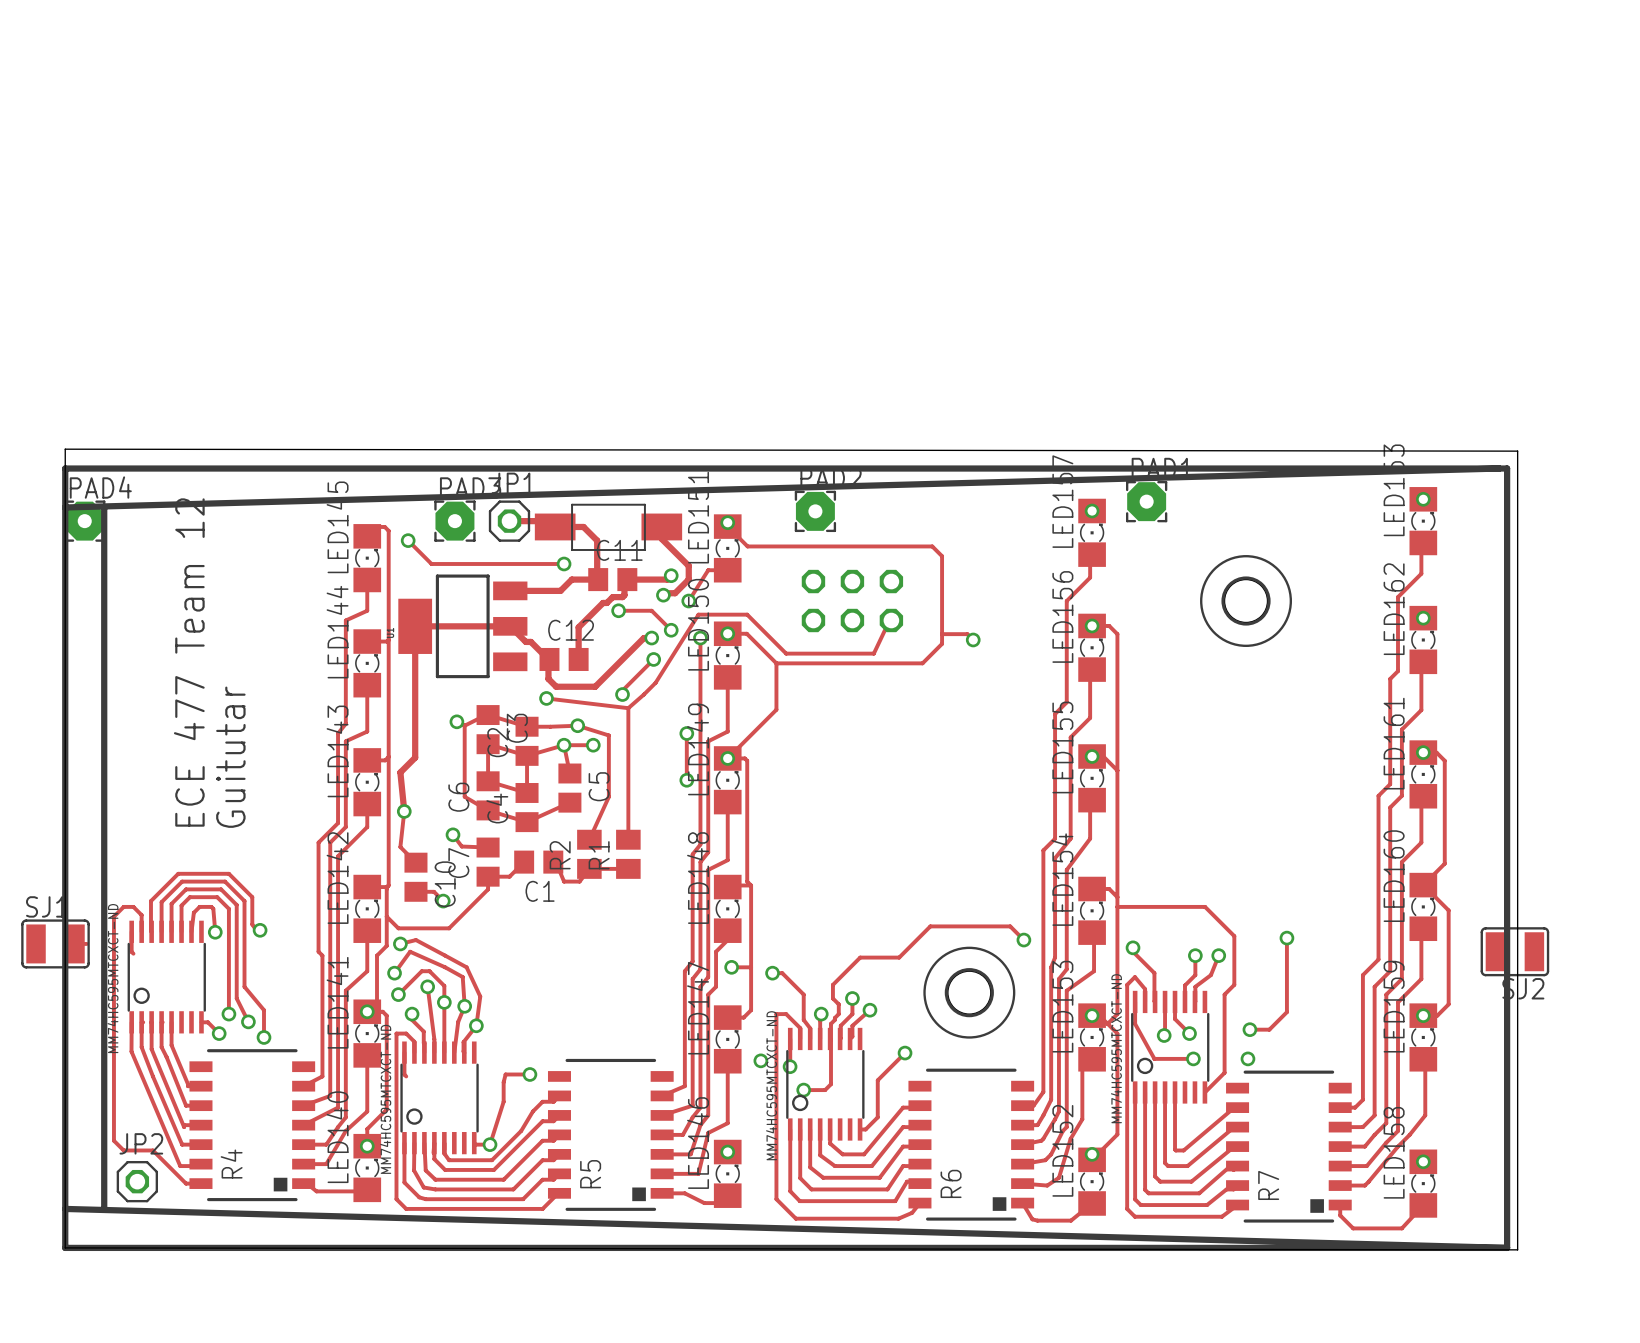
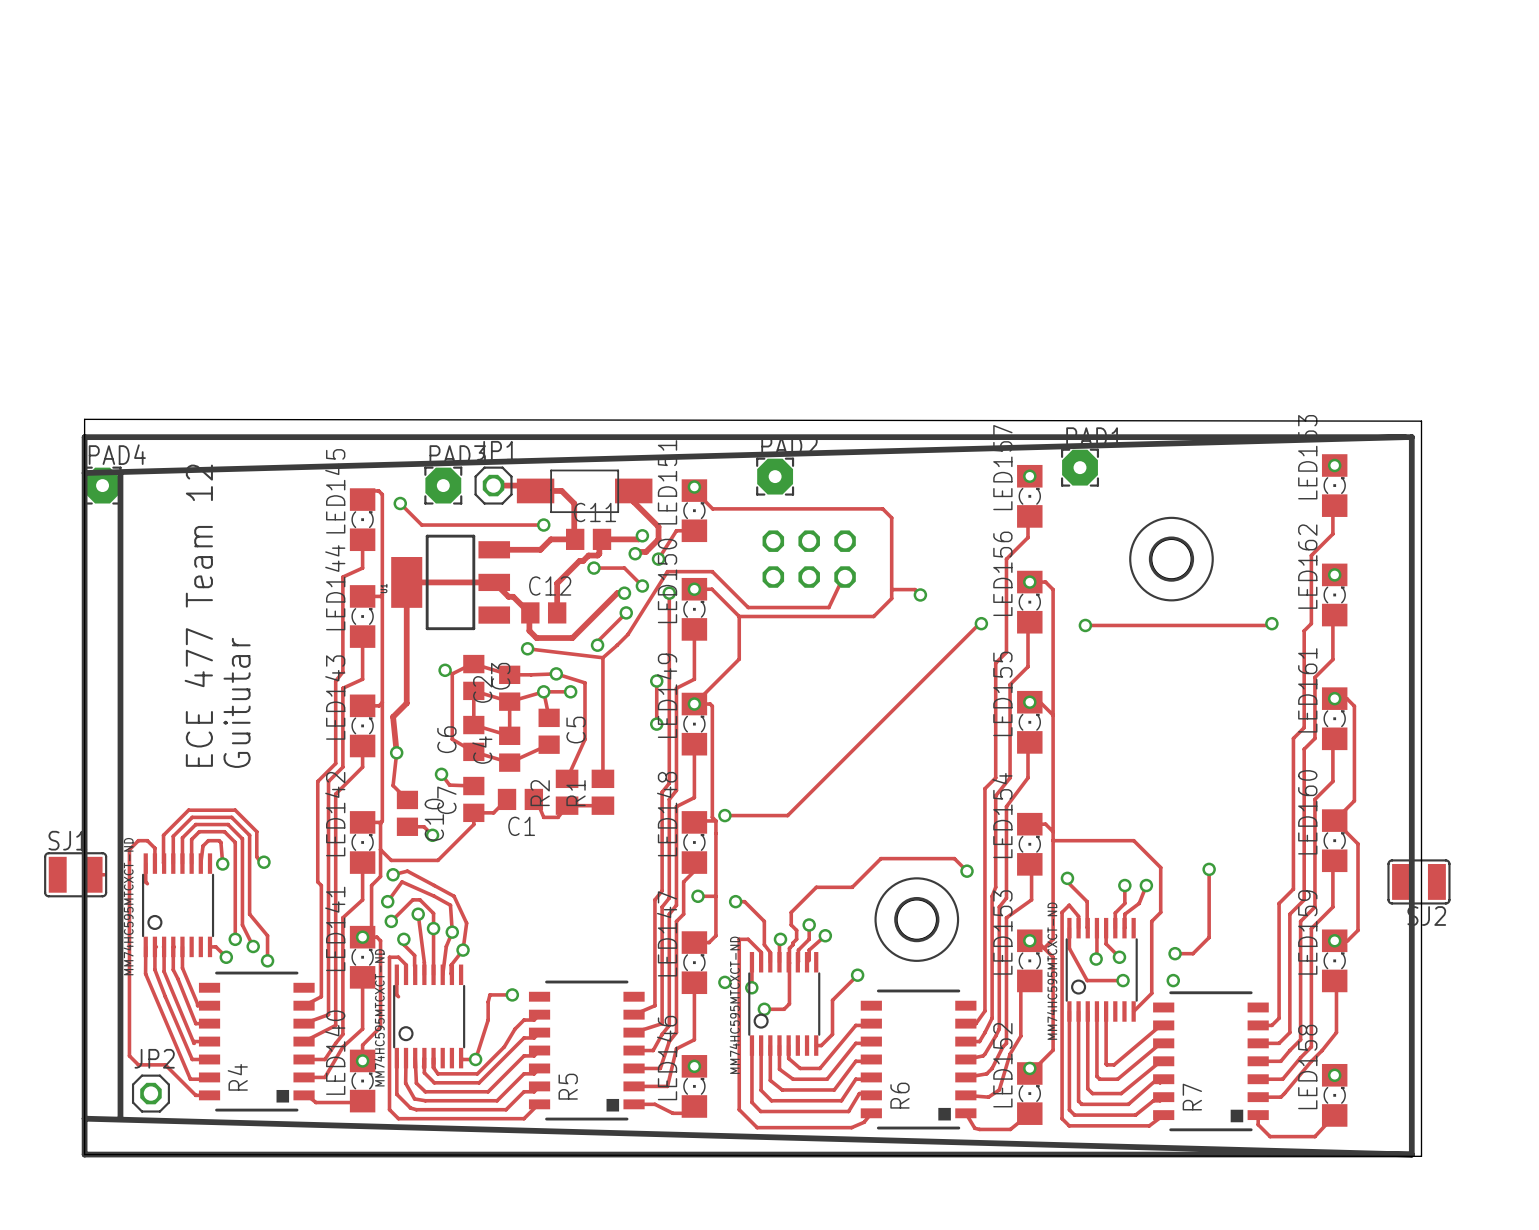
track: none -> (981, 623) (787, 815) (724, 815)
via: none -> (981, 623)
track: none -> (1271, 623) (1270, 625) (1085, 625)
via: none -> (1271, 623)
via: none -> (1085, 625)
via: none -> (724, 815)

